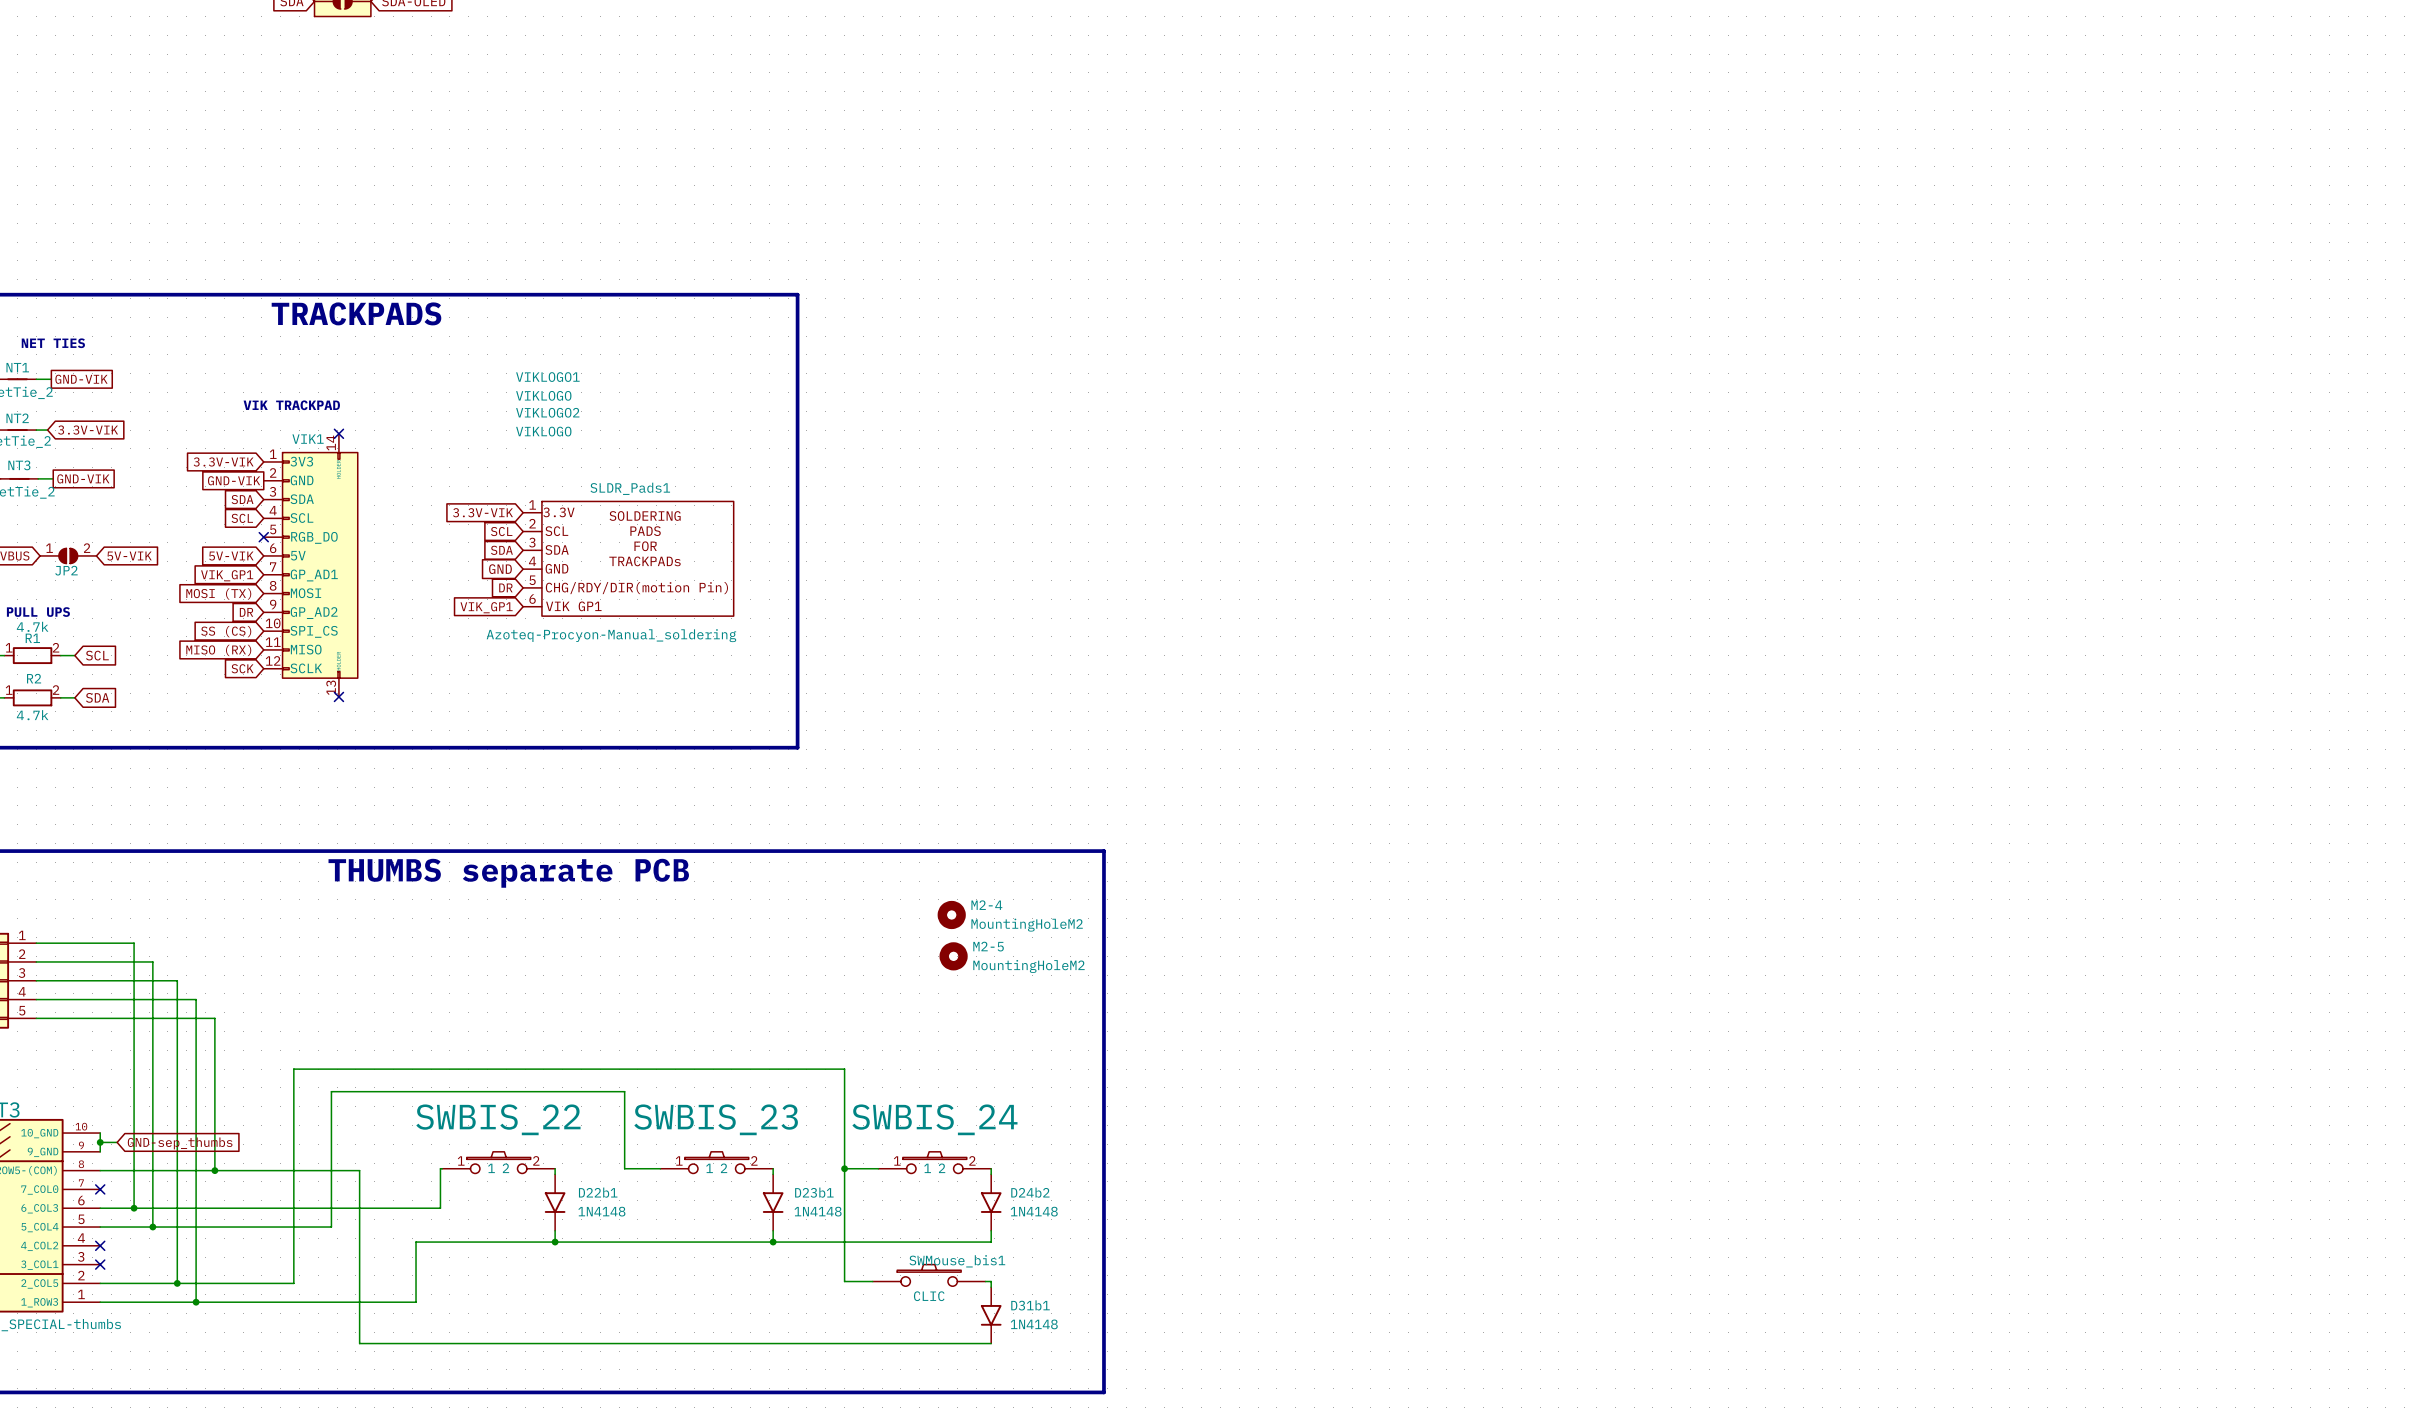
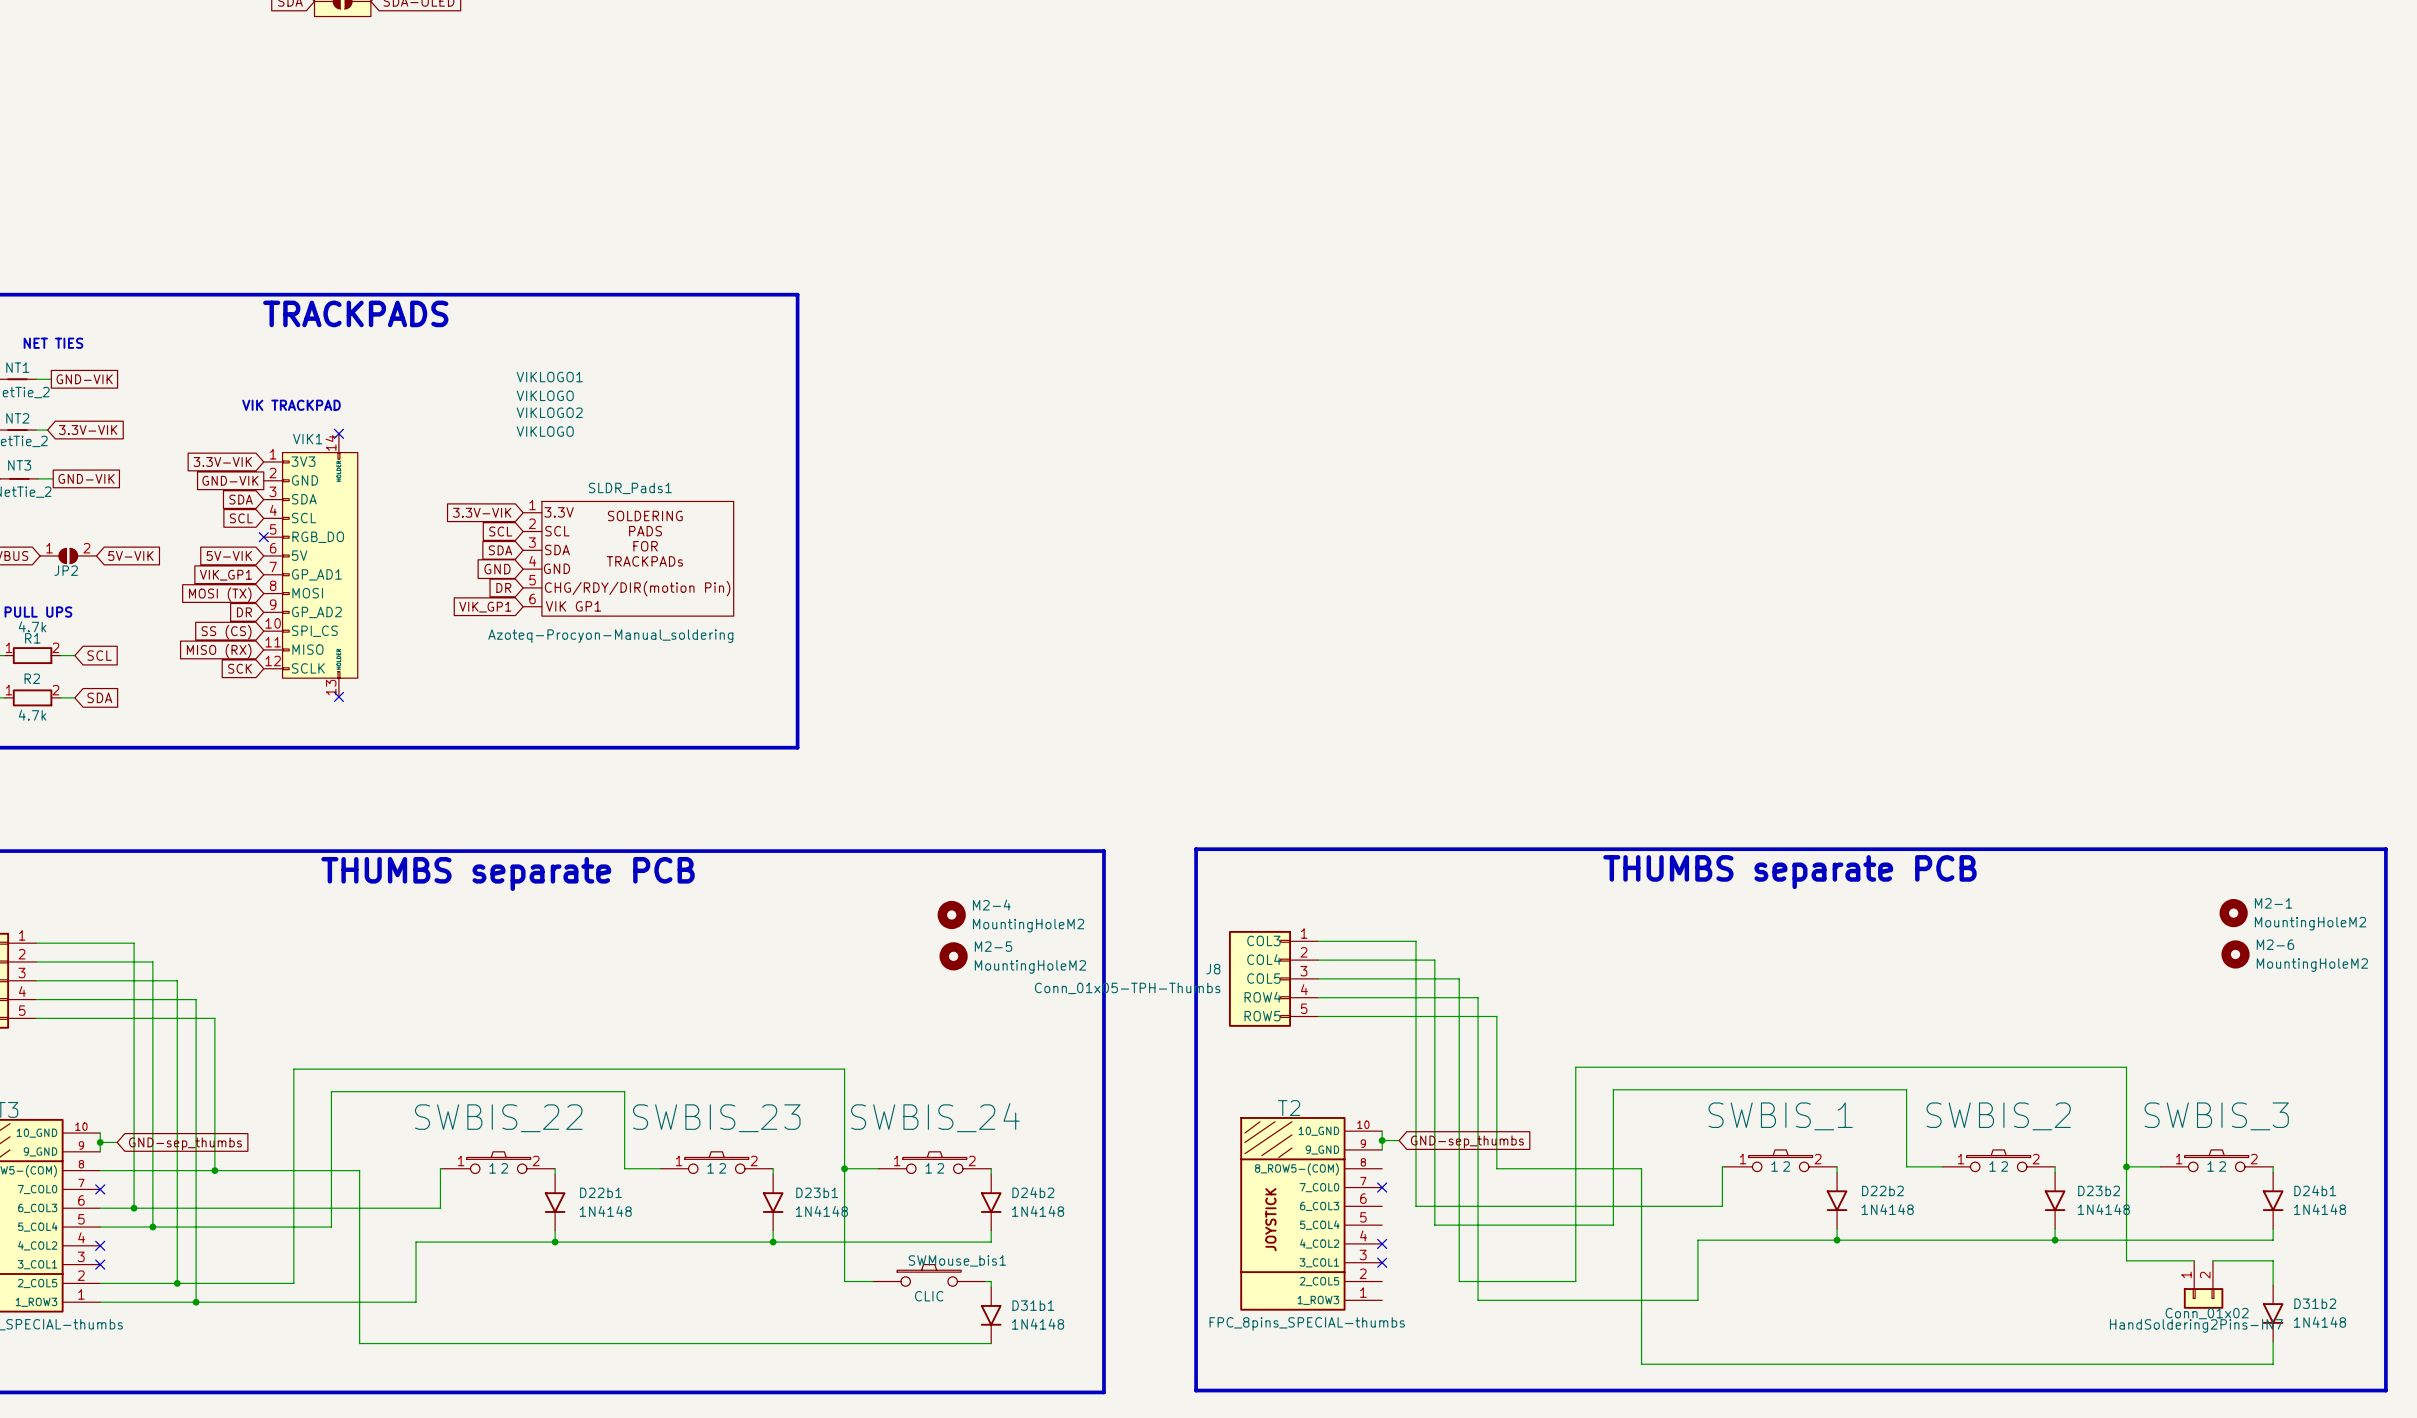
line: none -> (1196, 849) (2385, 849) (2385, 1390) (1196, 1390) (1196, 849)
text: none -> THUMBS separate PCB (1789, 872)
M2-1: none -> MountingHoleM2 (2233, 913)
wire: none -> (1318, 941) (1416, 941) (1416, 1206) (1722, 1206) (1722, 1166) (1724, 1166)
M2-6: none -> MountingHoleM2 (2235, 954)
wire: none -> (1318, 960) (1434, 960) (1434, 1225) (1613, 1225) (1613, 1089) (1906, 1089) (1906, 1166) (1942, 1166)
J8: none -> Conn_01x05-TPH-Thumbs (1273, 978)
wire: none -> (1318, 978) (1459, 978) (1459, 1281) (1575, 1281) (1575, 1067) (2126, 1067) (2126, 1260) (2194, 1260)
wire: none -> (1318, 997) (1478, 997) (1478, 1300) (1697, 1300) (1697, 1240) (2273, 1240) (2273, 1228)
wire: none -> (1318, 1016) (1496, 1016) (1496, 1168) (1641, 1168) (1641, 1364) (2273, 1364) (2273, 1341)
wire: none -> (1382, 1131) (1382, 1149)
wire: none -> (1382, 1140) (1399, 1140)
junction: none -> (1382, 1140)
global label: none -> GND-sep_thumbs (1467, 1142)
SWBIS_1: none -> (1780, 1160)
SWBIS_2: none -> (1998, 1160)
SWBIS_3: none -> (2216, 1160)
wire: none -> (1837, 1166) (1837, 1172)
wire: none -> (2055, 1166) (2055, 1172)
wire: none -> (2126, 1166) (2160, 1166)
junction: none -> (2126, 1166)
wire: none -> (2273, 1166) (2273, 1172)
no-connect mark: none -> (1382, 1187)
D22b2: none -> 1N4148 (1837, 1200)
D23b2: none -> 1N4148 (2055, 1200)
D24b1: none -> 1N4148 (2273, 1200)
T2: none -> FPC_8pins_SPECIAL-thumbs (1311, 1213)
wire: none -> (1837, 1228) (1837, 1240)
wire: none -> (2055, 1228) (2055, 1240)
junction: none -> (1837, 1240)
junction: none -> (2055, 1240)
no-connect mark: none -> (1382, 1243)
wire: none -> (2212, 1260) (2273, 1260) (2273, 1285)
no-connect mark: none -> (1382, 1262)
HandSoldering2Pins-IN7: none -> Conn_01x02 (2203, 1284)
D31b2: none -> 1N4148 (2273, 1313)

